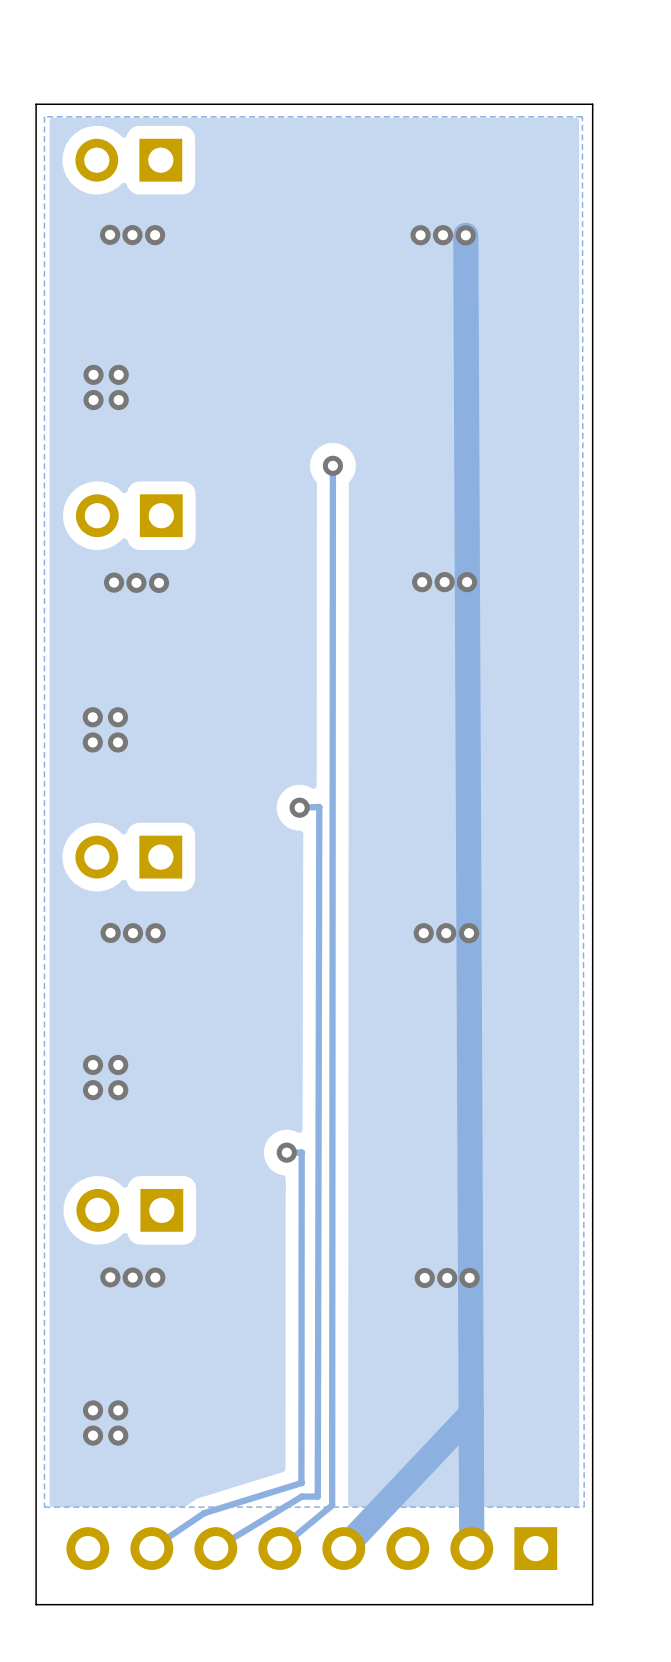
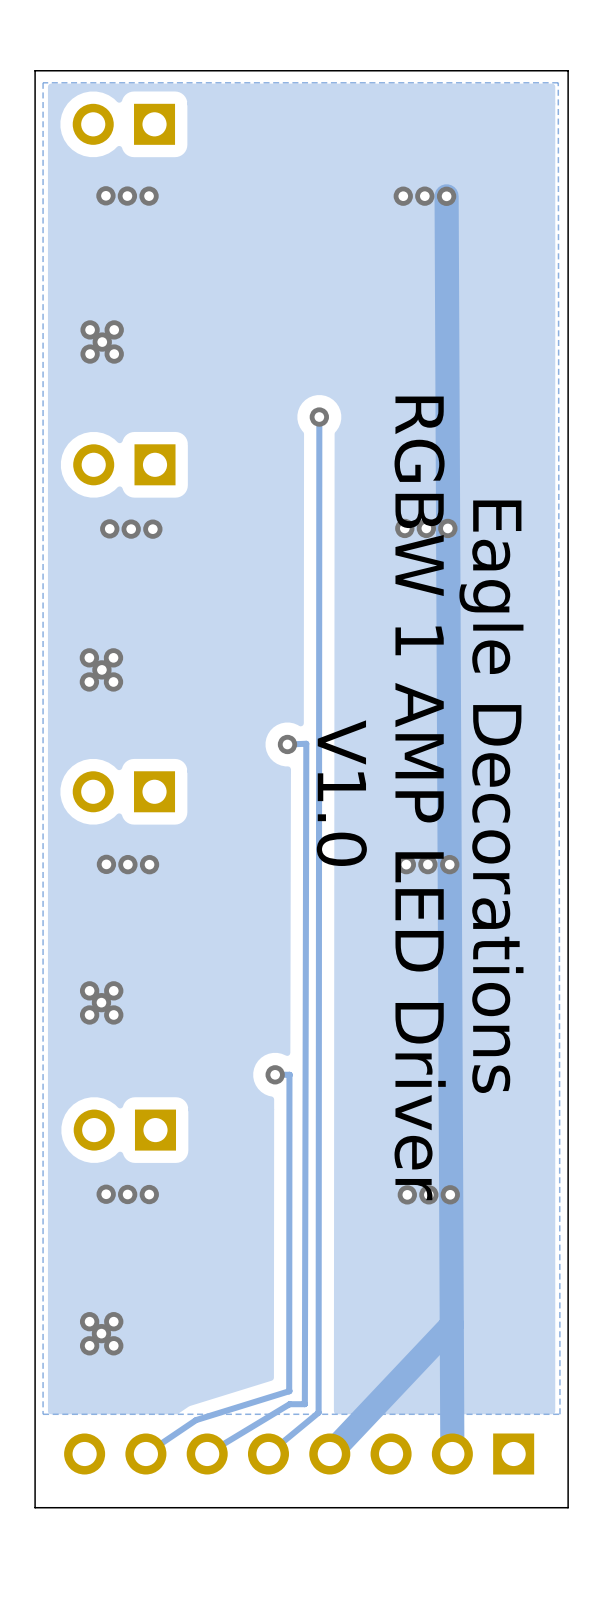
via: none -> (102, 342)
via: none -> (101, 669)
text: none -> V1.0 (341, 793)
text: none -> Eagle Decorations (491, 796)
text: none -> RGBW 1 AMP LED Driver (420, 798)
via: none -> (101, 1002)
via: none -> (101, 1333)

